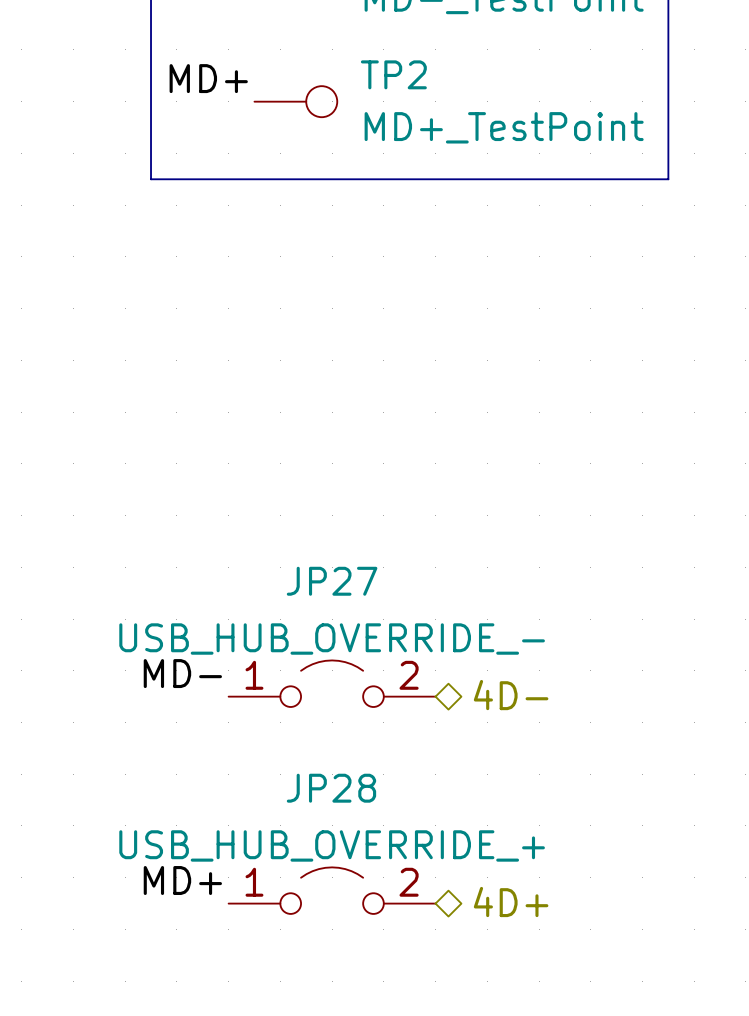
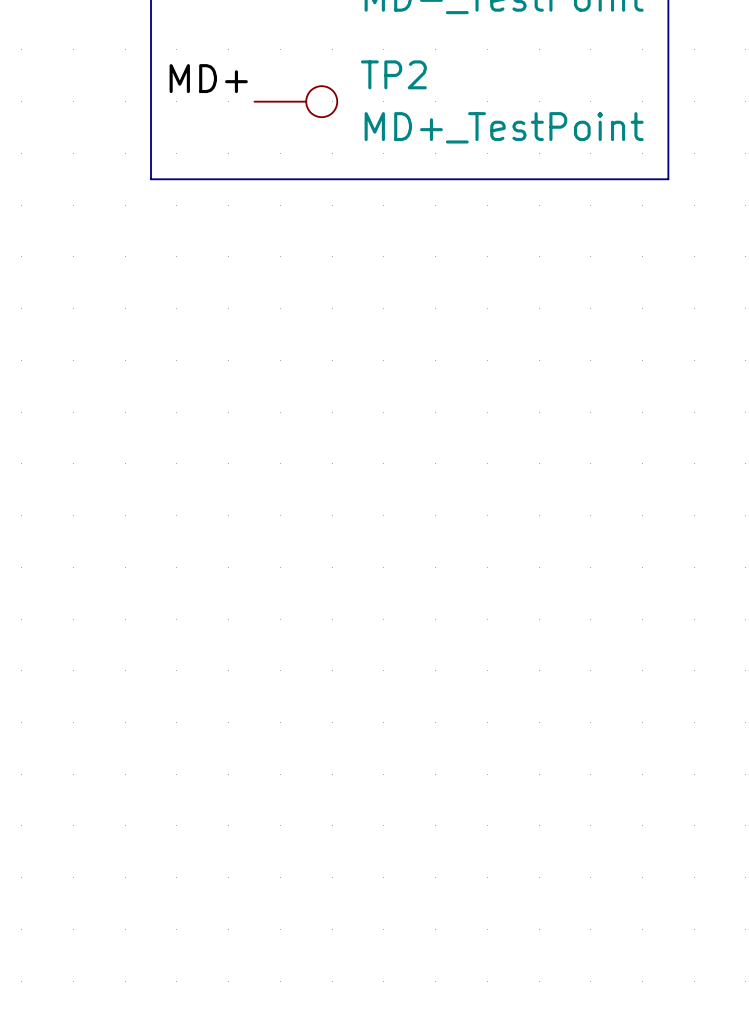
label: MD- (182, 673) -> none
JP27: USB_HUB_OVERRIDE_- (332, 683) -> none
hierarchical label: 4D- (511, 695) -> none
label: MD+ (182, 880) -> none
JP28: USB_HUB_OVERRIDE_+ (332, 890) -> none
hierarchical label: 4D+ (511, 902) -> none

